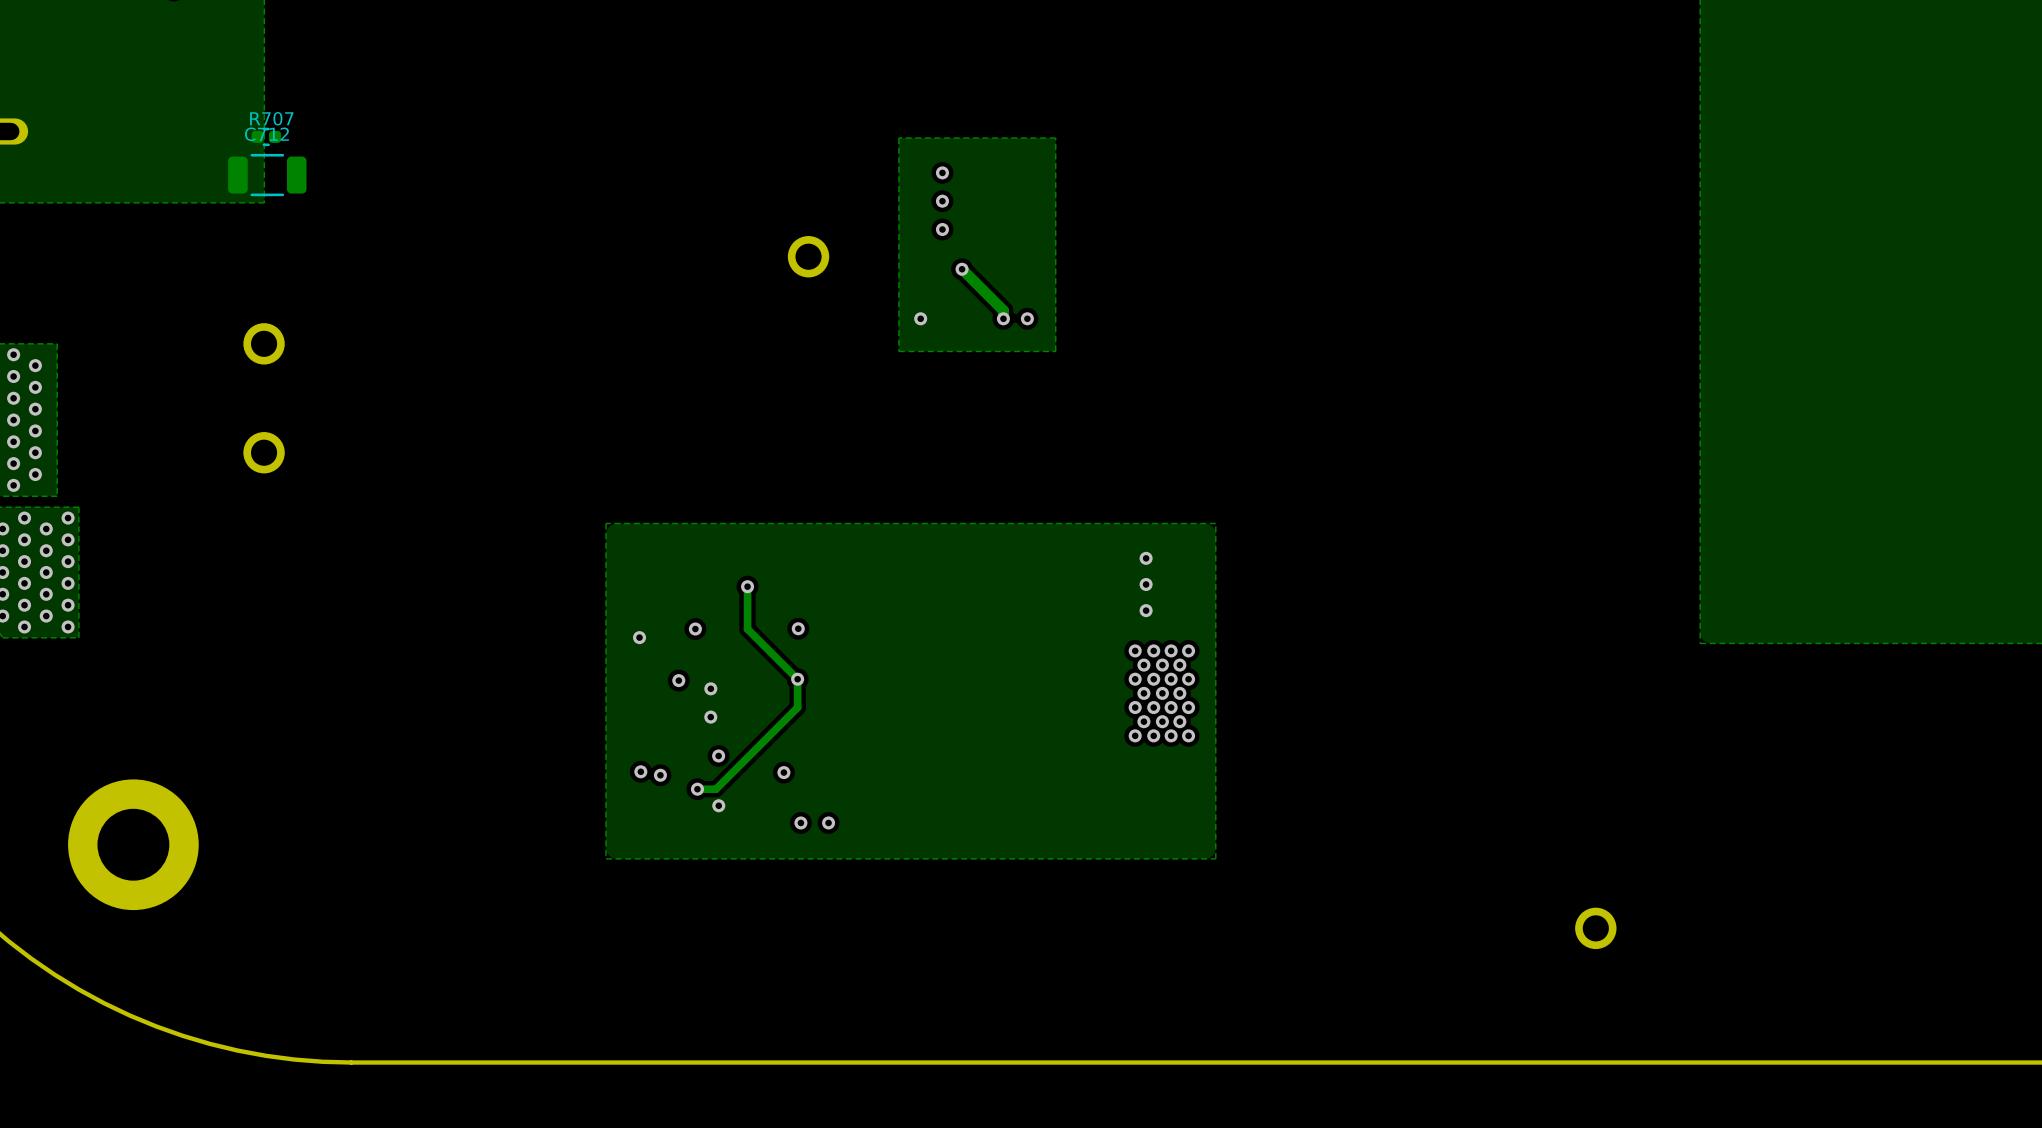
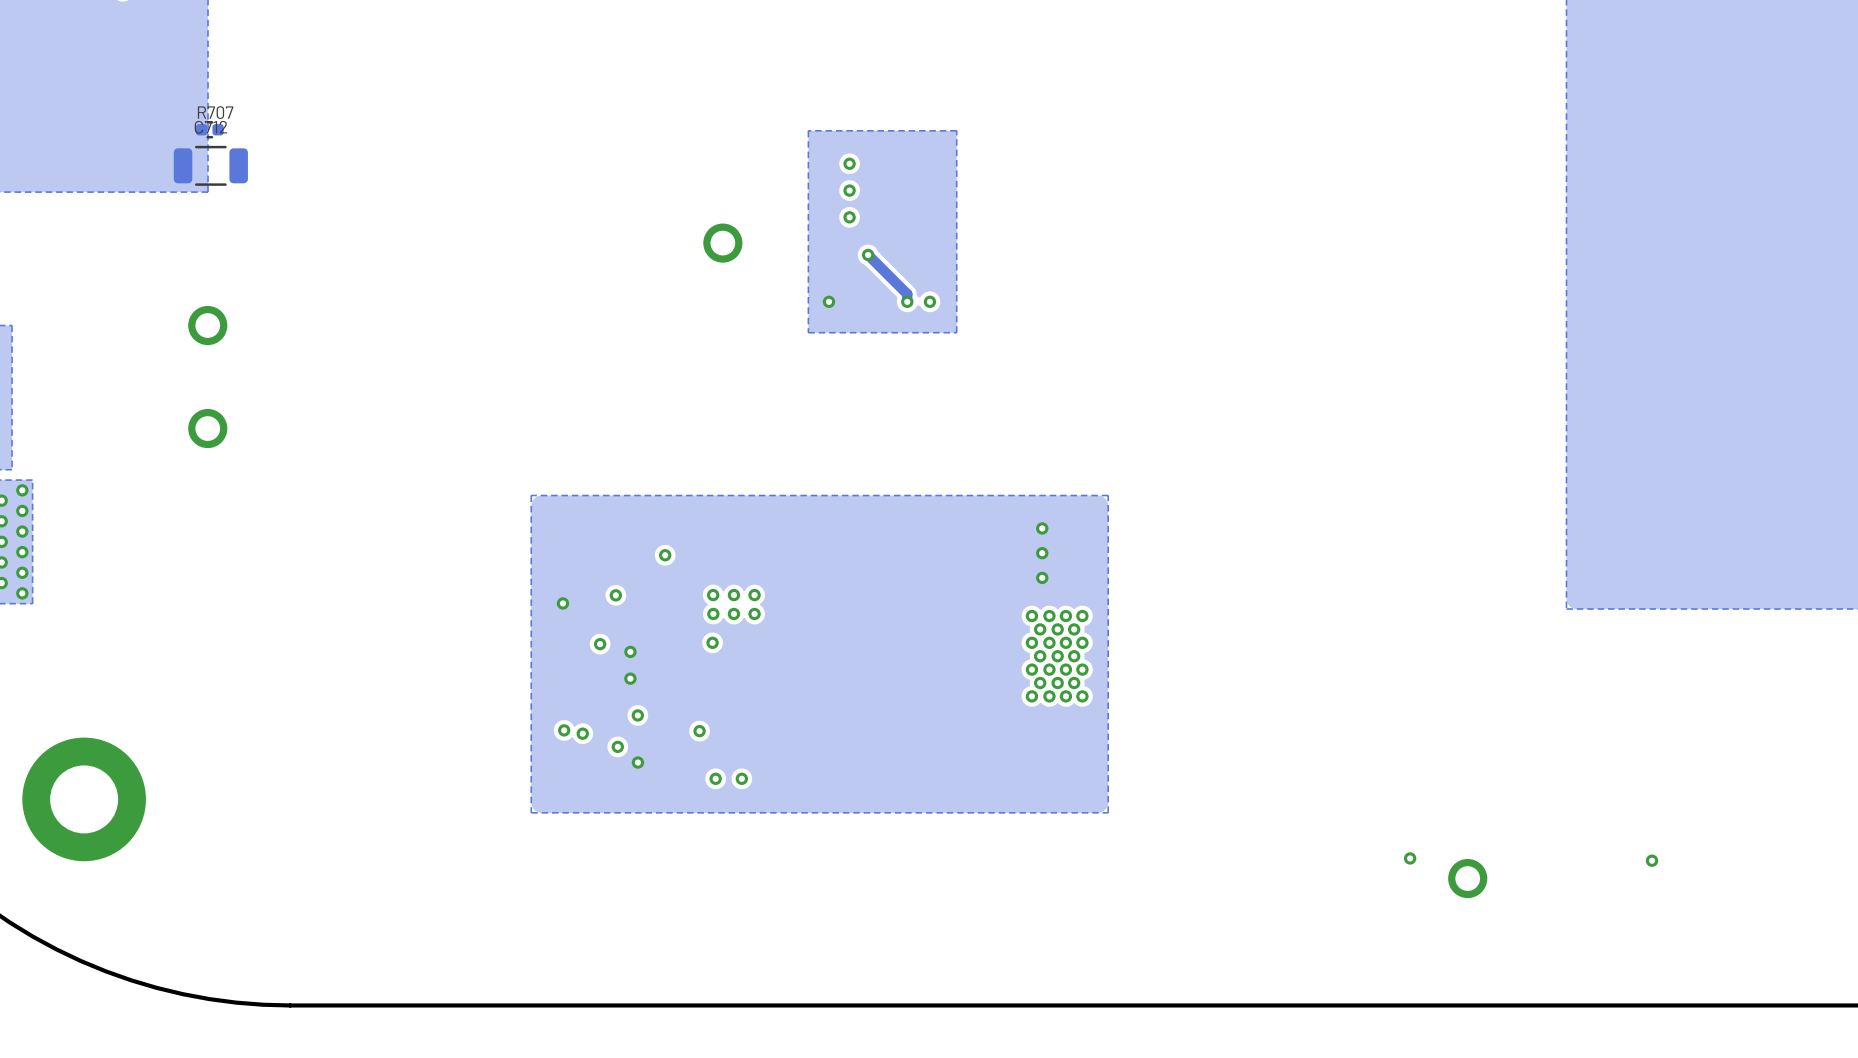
track: (747, 586) (747, 629) (797, 679) (797, 707) (715, 789) (697, 789) -> none
via: none -> (733, 595)
via: none -> (754, 595)
via: none -> (713, 613)
via: none -> (733, 613)
via: none -> (754, 613)
via: none -> (1410, 858)
via: none -> (1652, 860)

